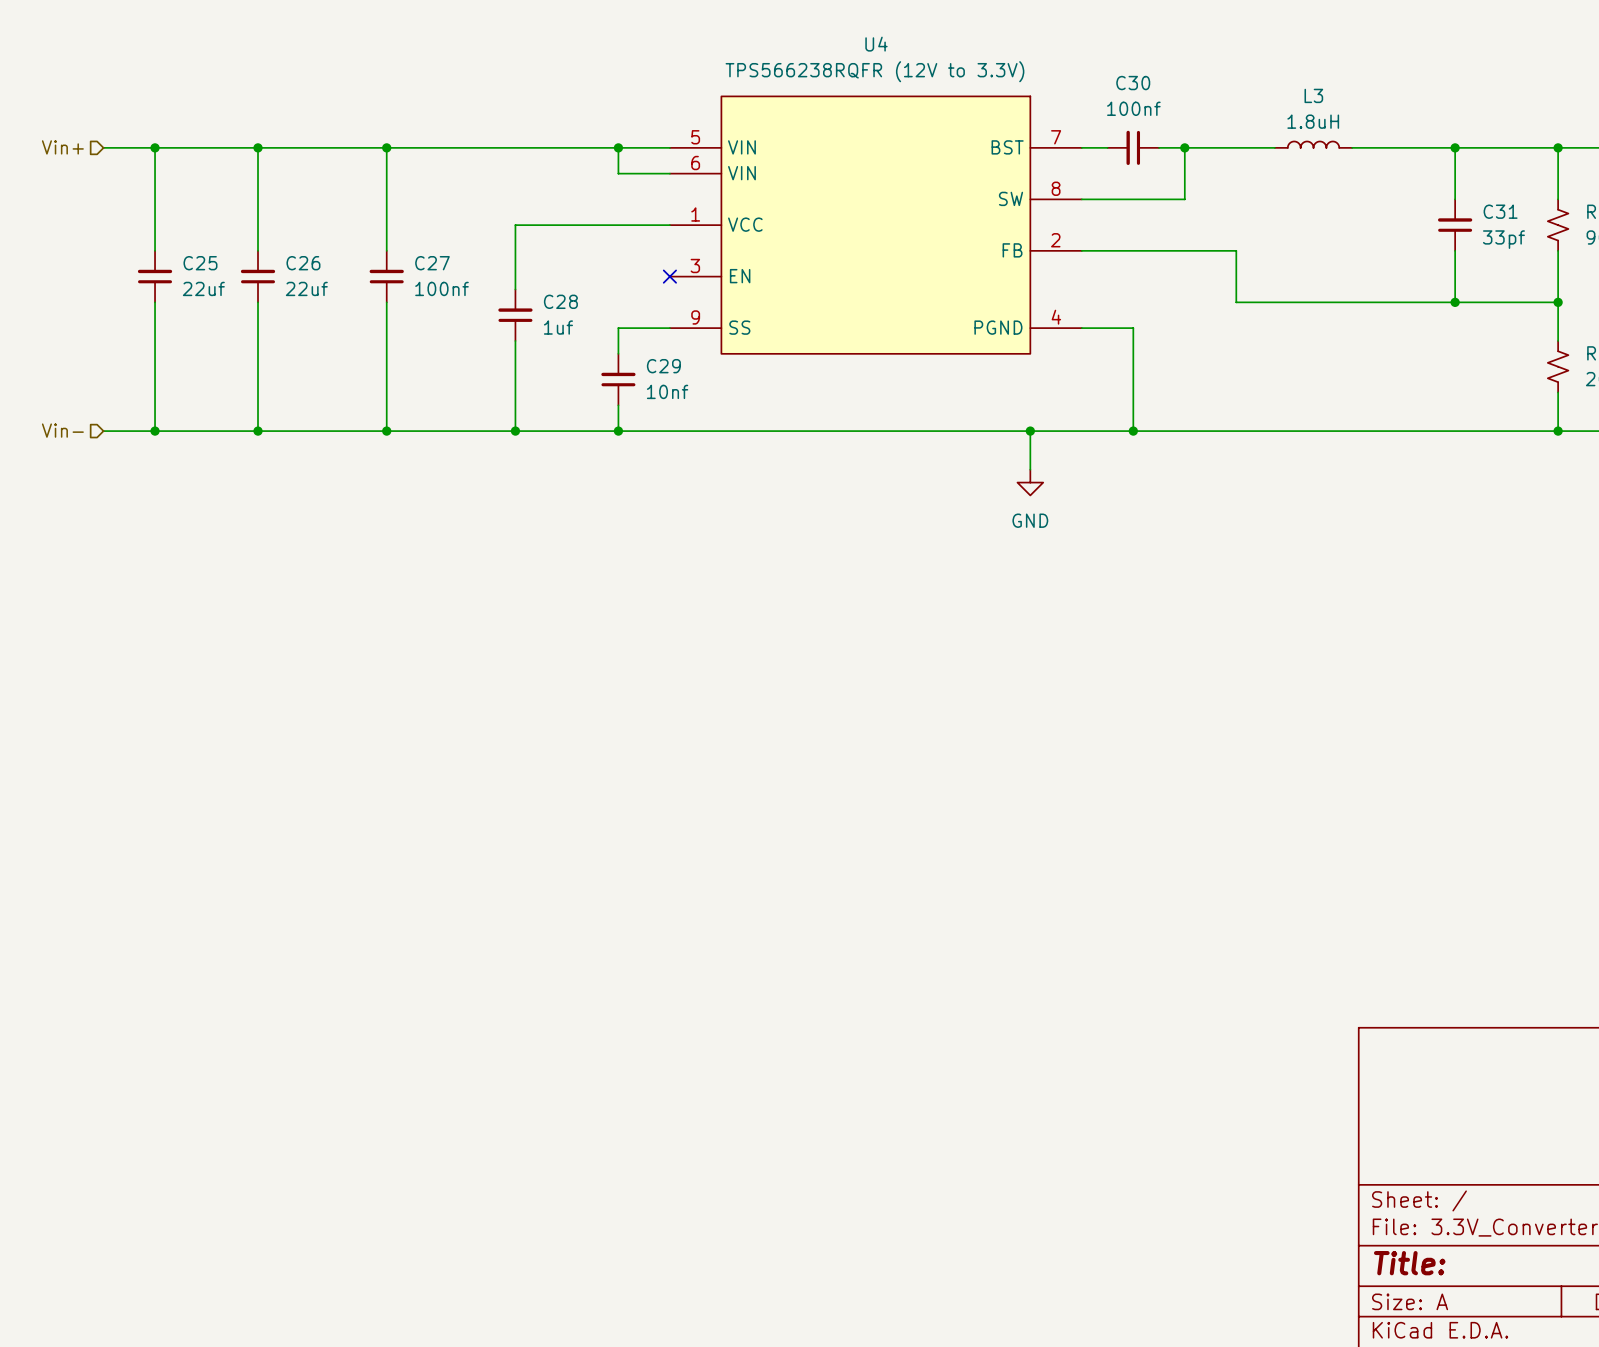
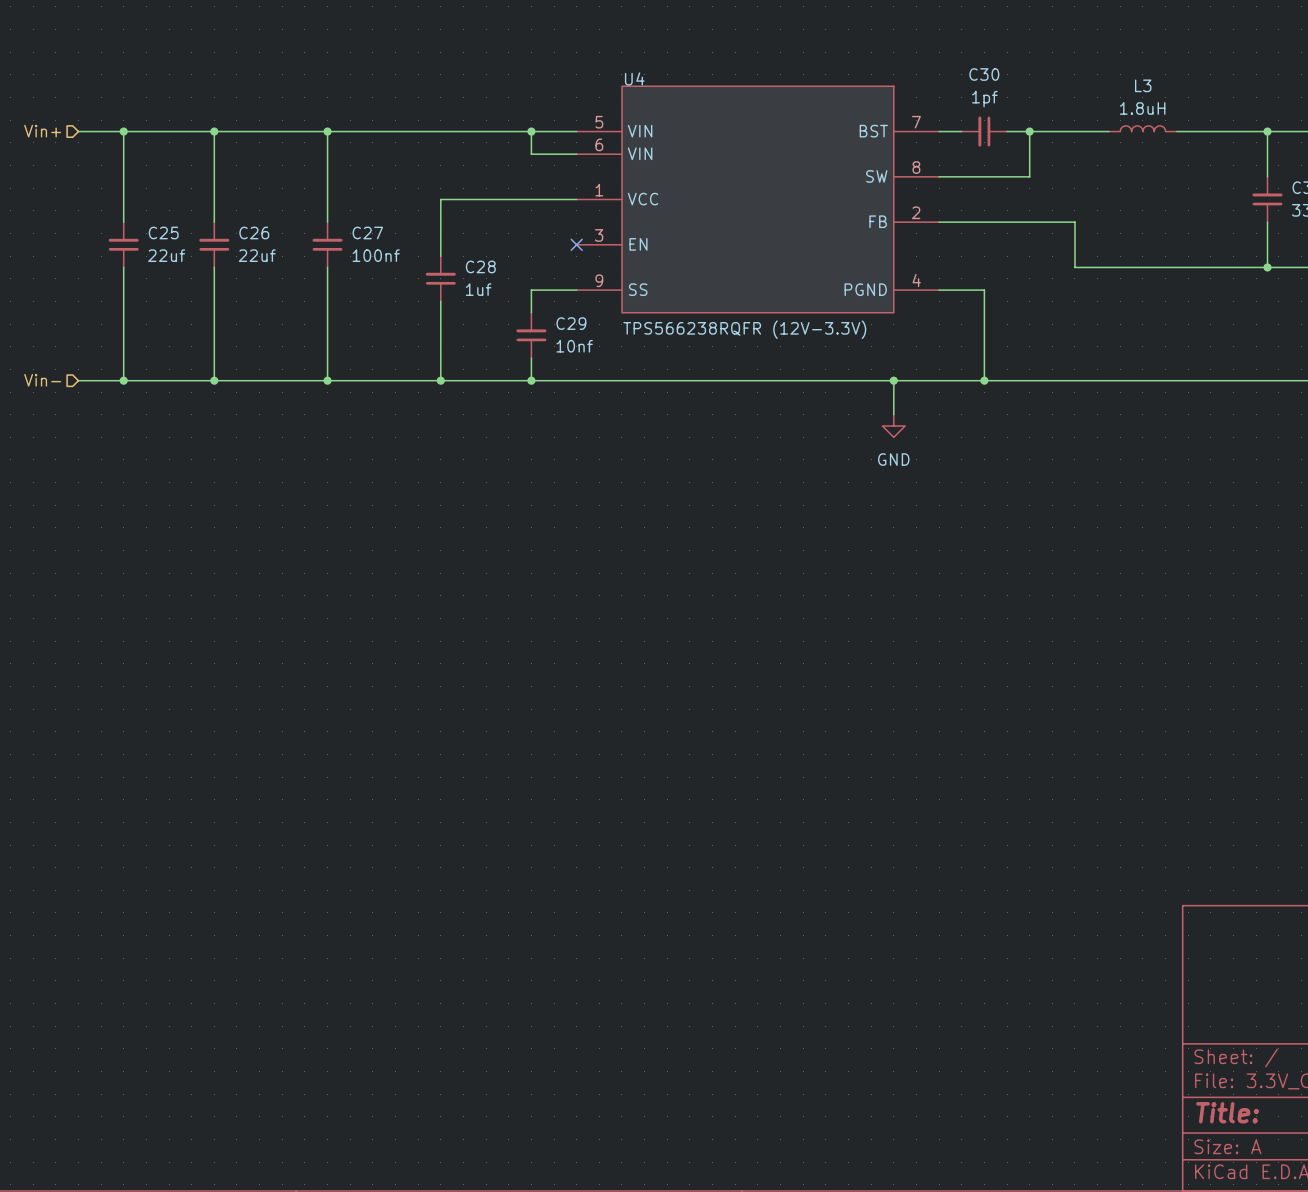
U4 name position: U4 (876, 44) -> U4 (634, 78)
U4 value: TPS566238RQFR (12V to 3.3V) (874, 71) -> TPS566238RQFR (12V-3.3V) (744, 329)
C30 value: 100nf (1133, 108) -> 1pf (984, 99)

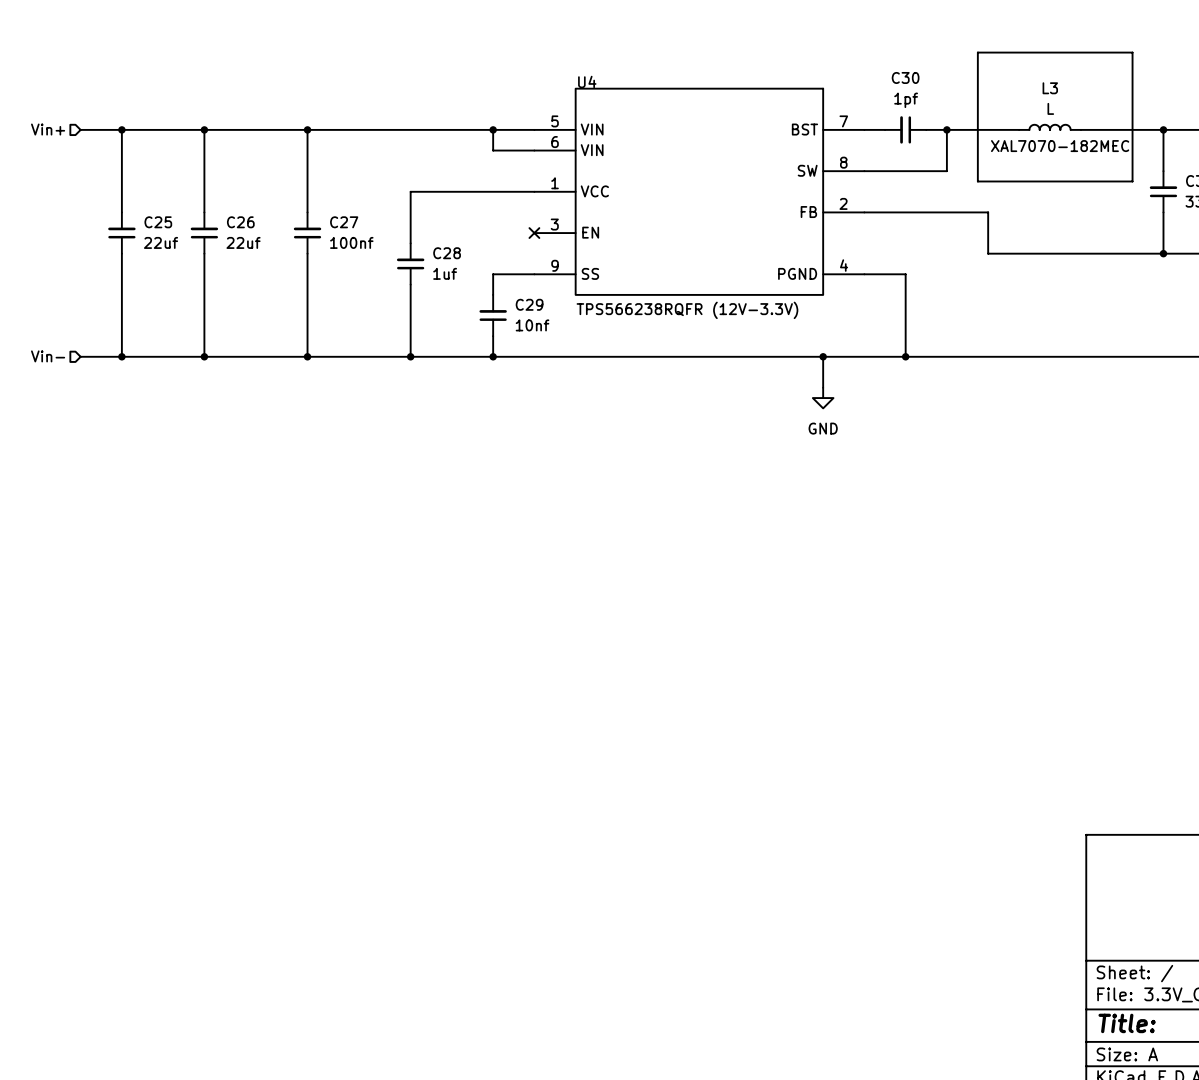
line: none -> (977, 52) (1132, 52) (1132, 181) (977, 181) (977, 52)
L3 value: 1.8uH (1142, 108) -> L (1050, 108)
text: none -> XAL7070-182MEC (1060, 146)

